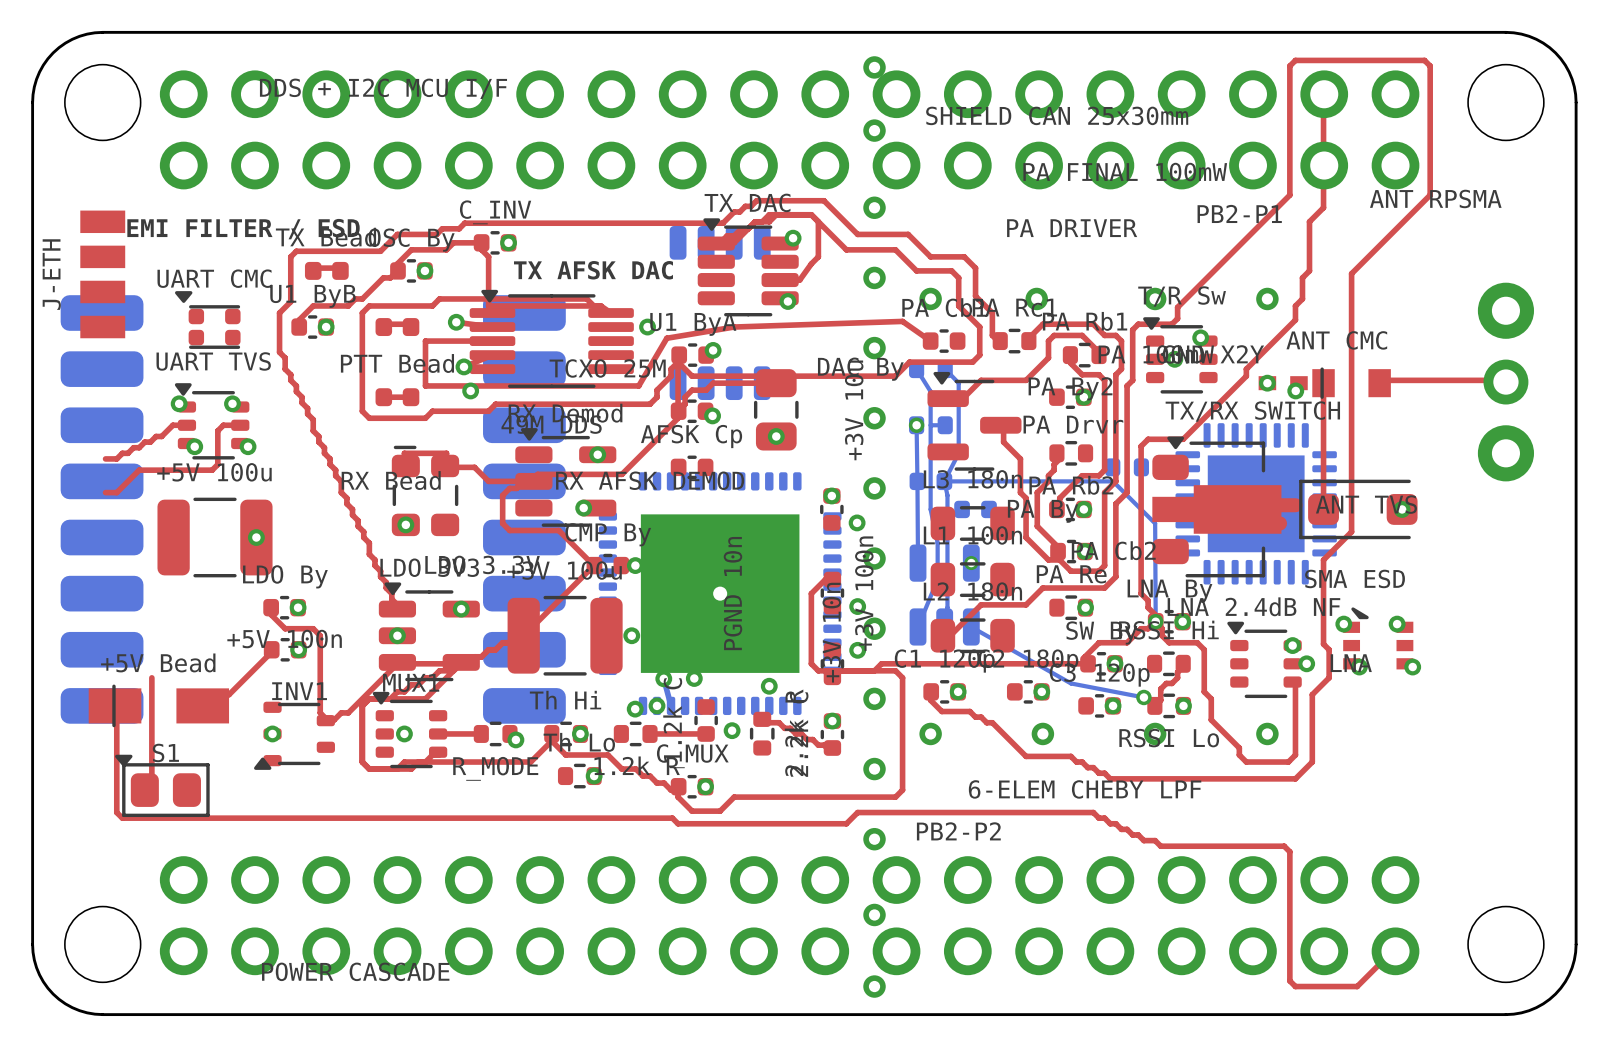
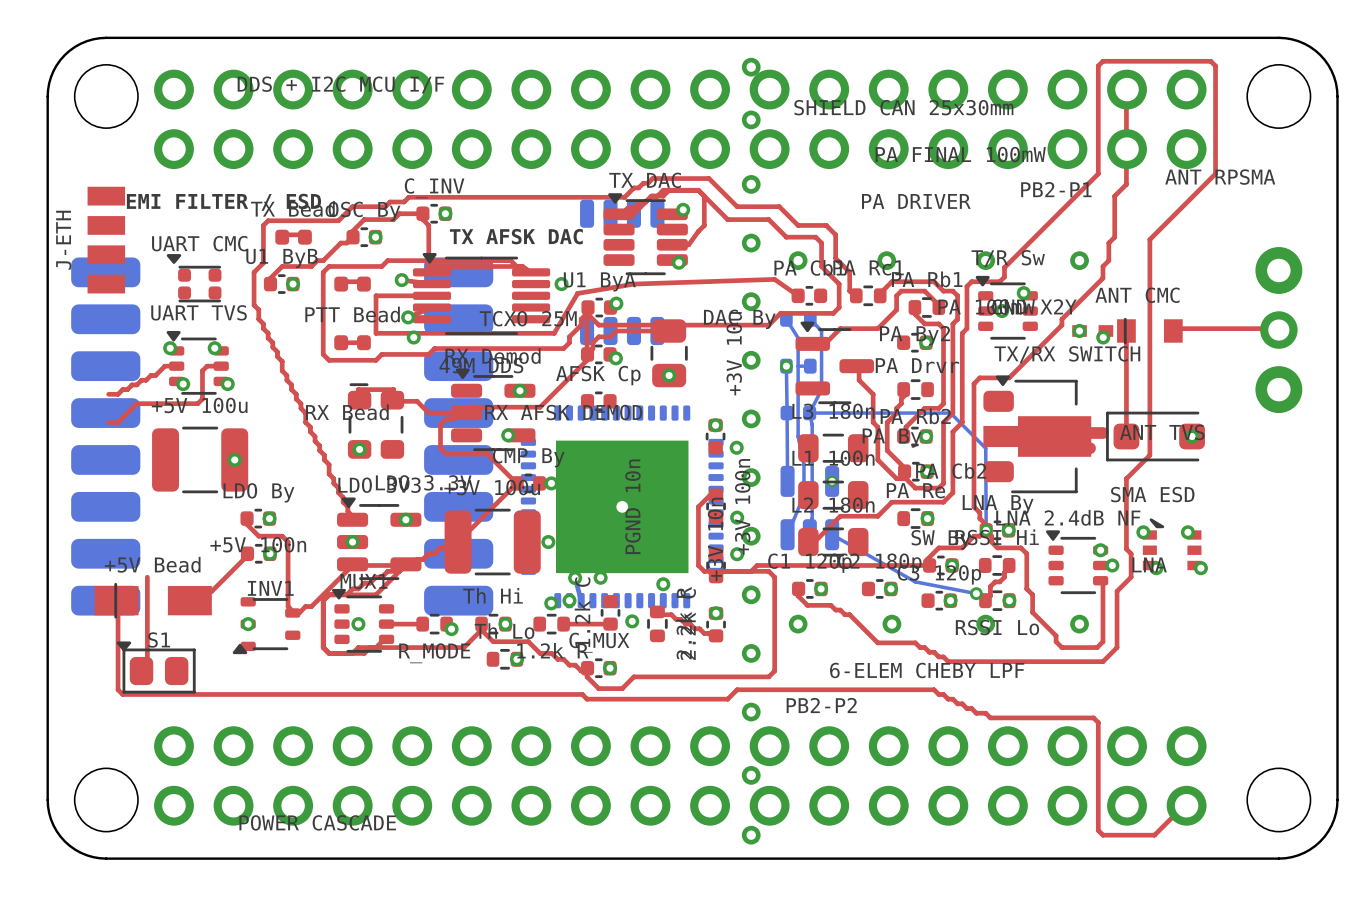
part: (1127, 467) -> none
part: (1256, 503) -> none
part: (975, 509) -> none

